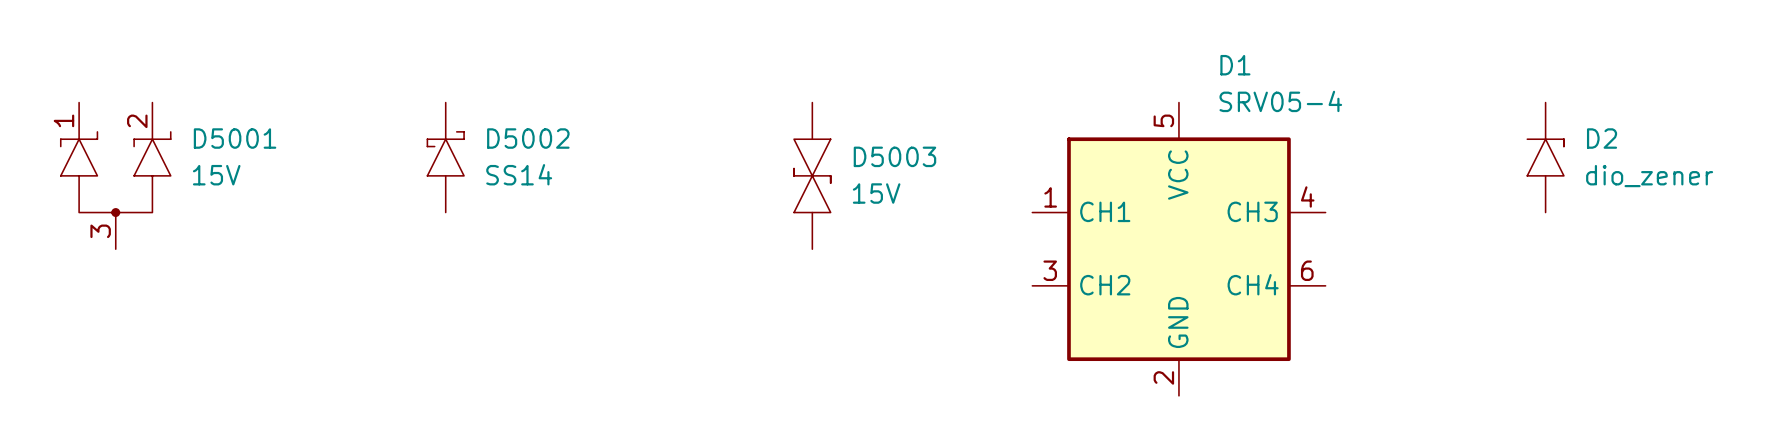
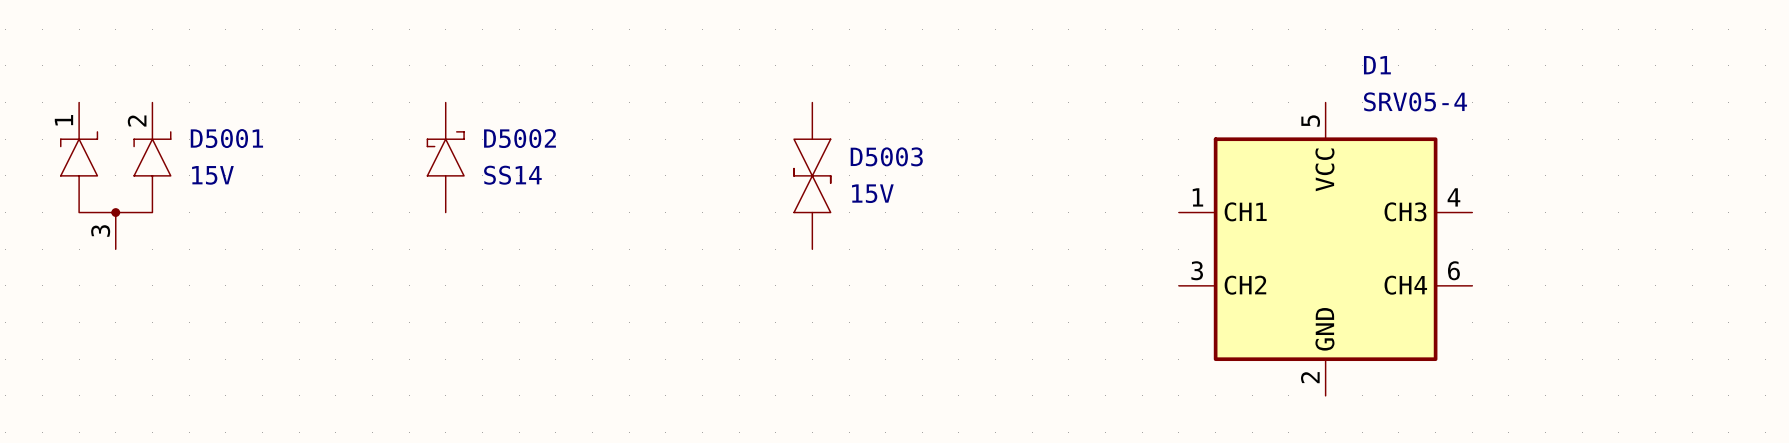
D2: dio_zener (1545, 157) -> none
D1 position: (1178, 249) -> (1325, 249)

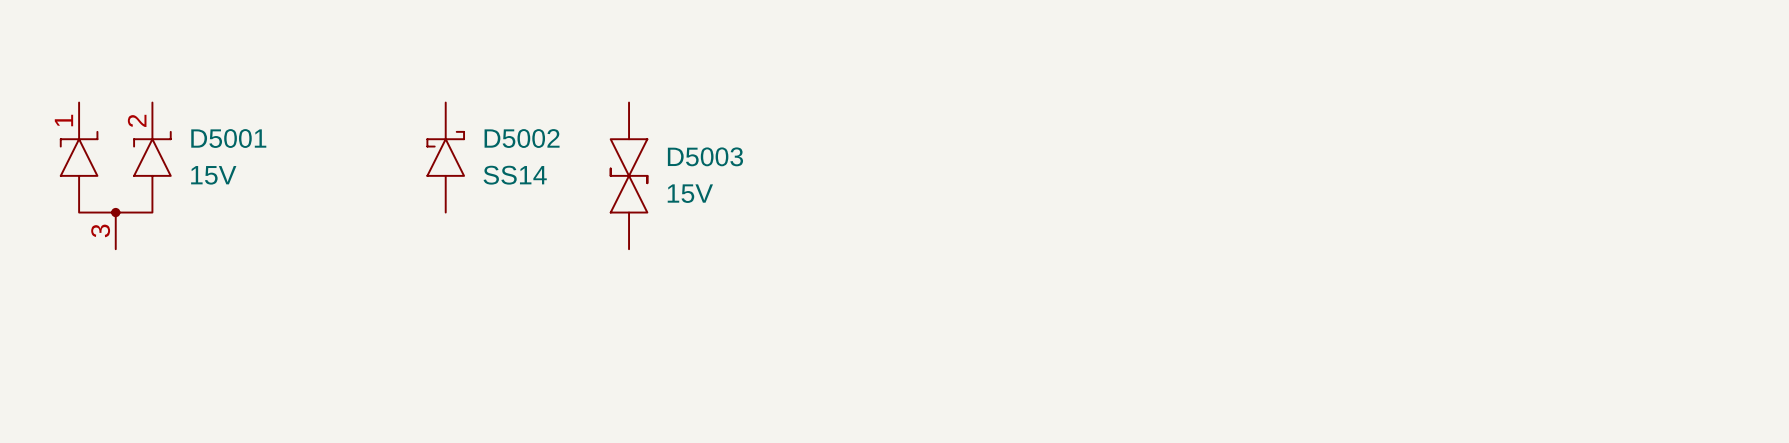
D5003 position: (812, 175) -> (629, 175)
D1: SRV05-4 (1325, 249) -> none

